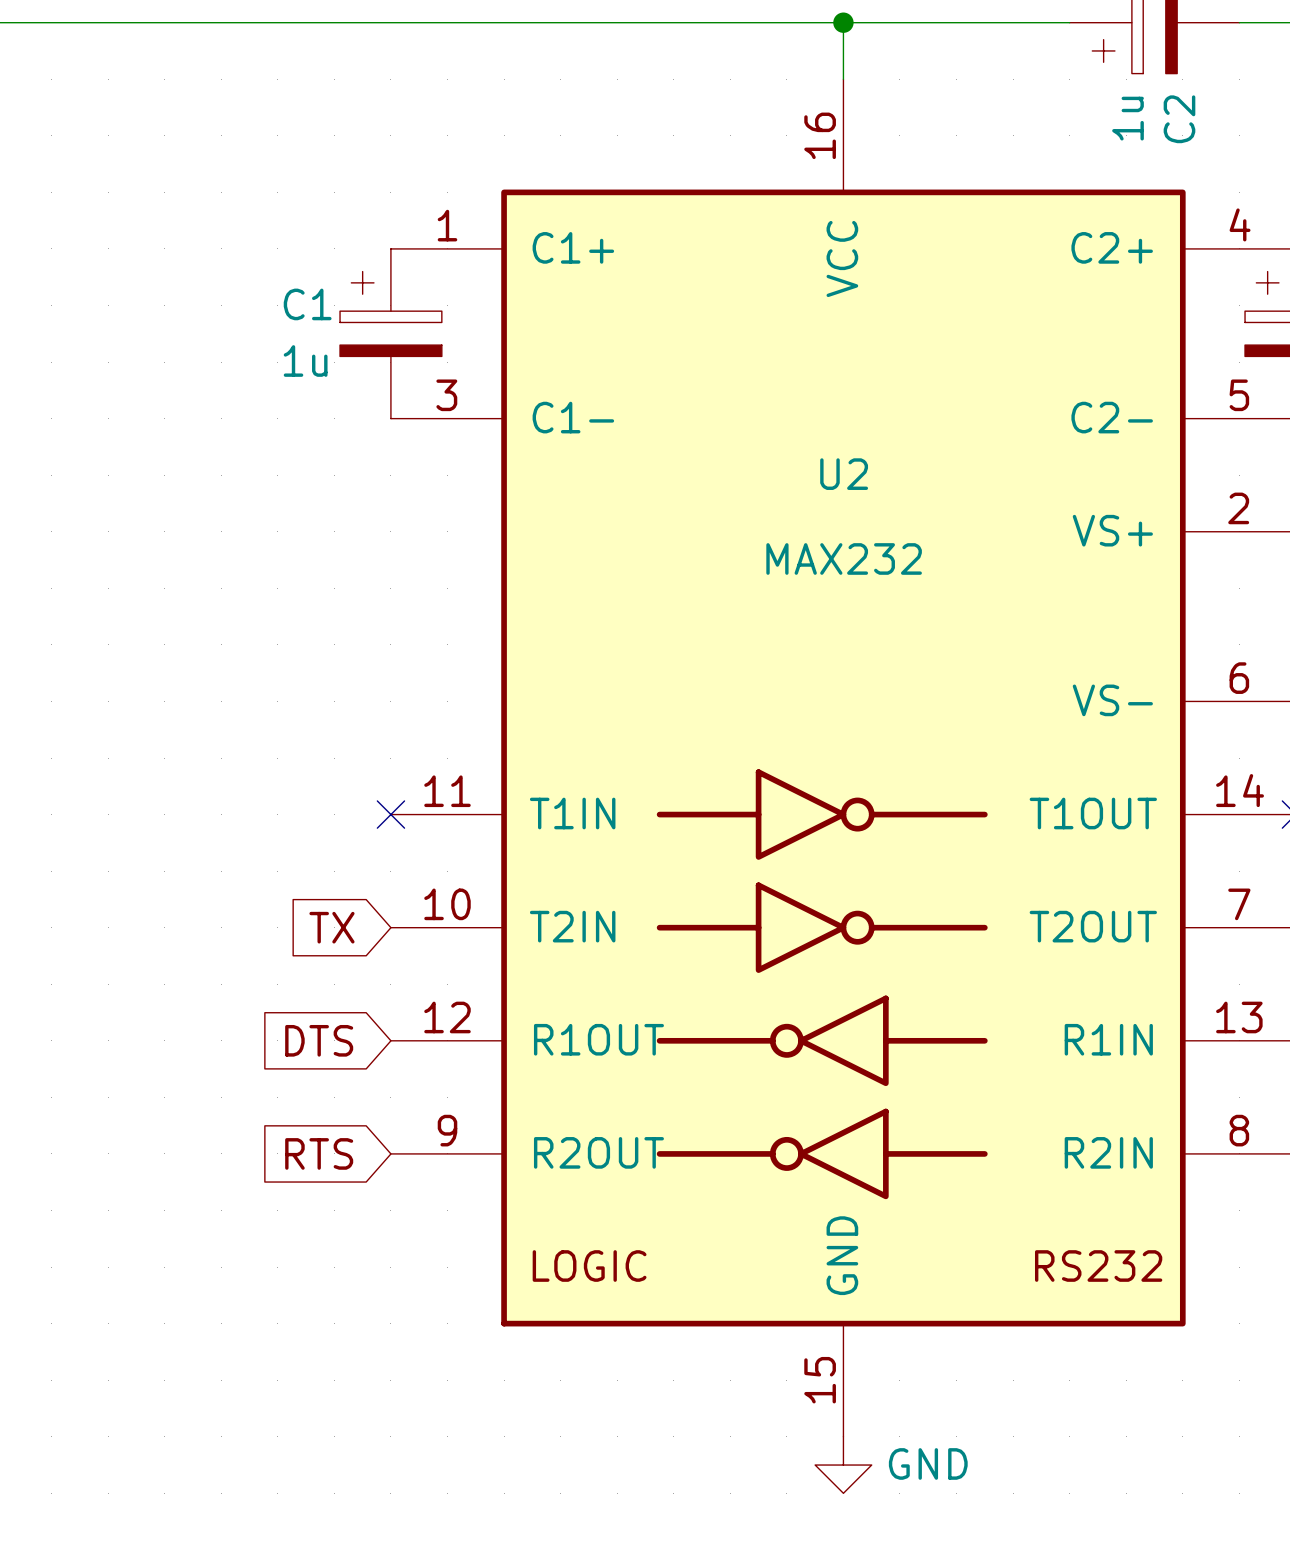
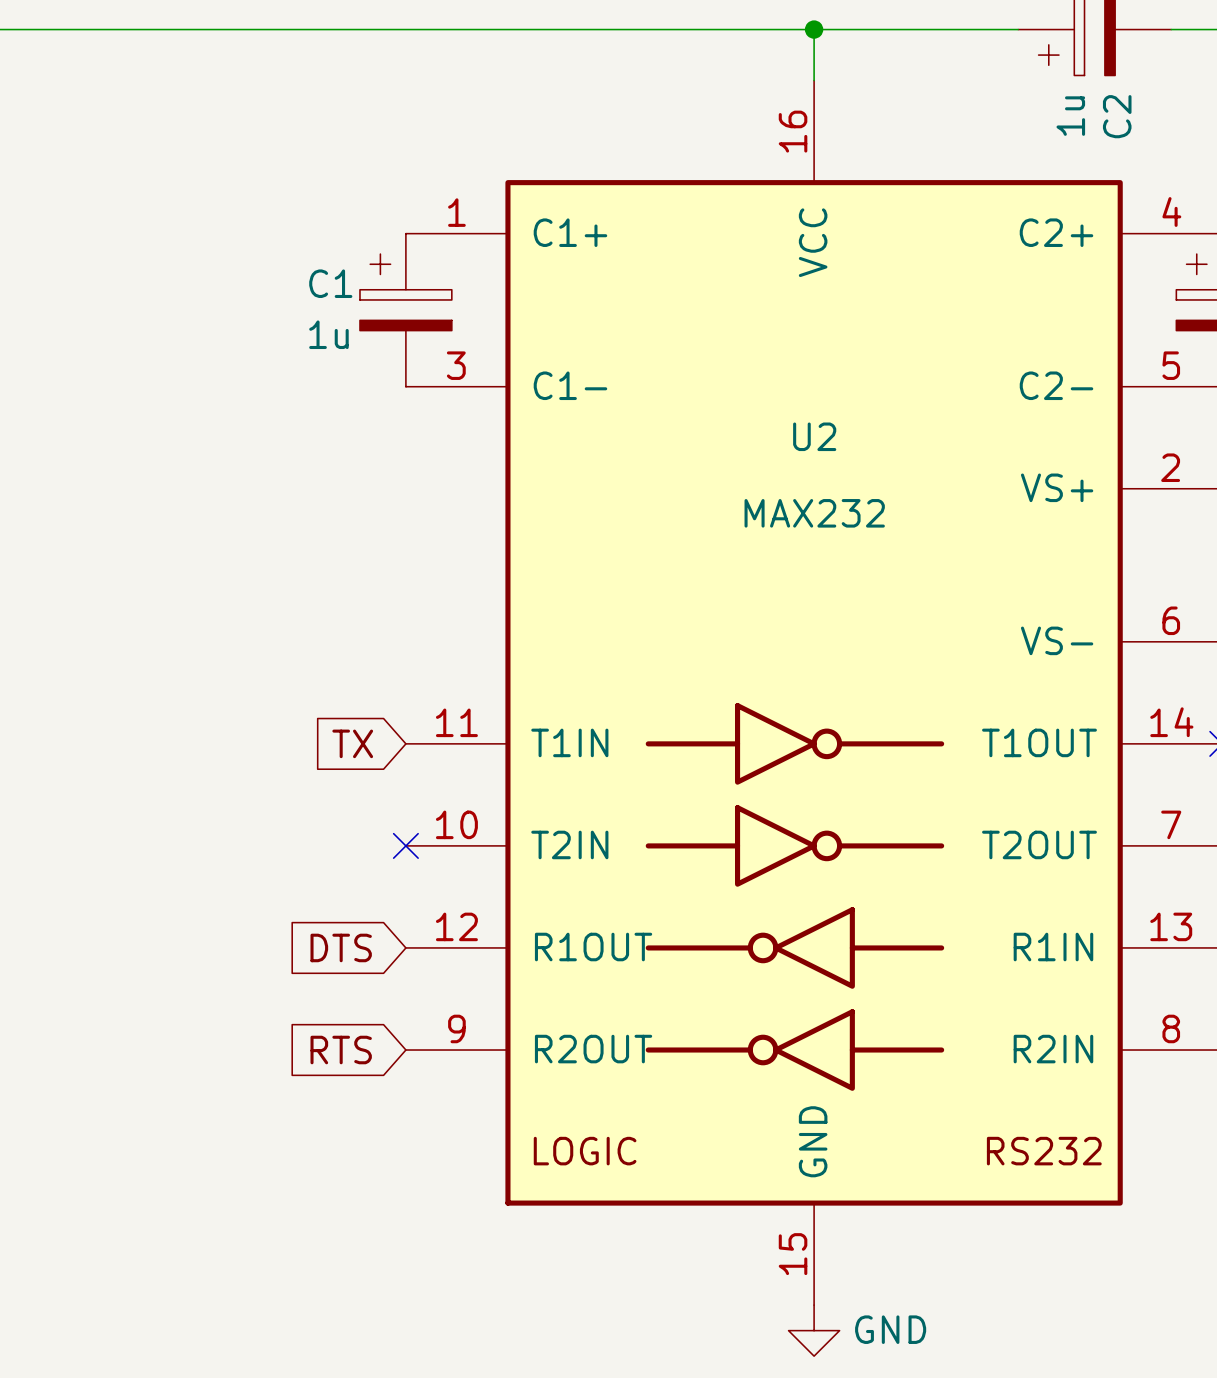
no-connect mark position: (390, 814) -> (405, 845)
global label position: TX (331, 927) -> TX (352, 743)

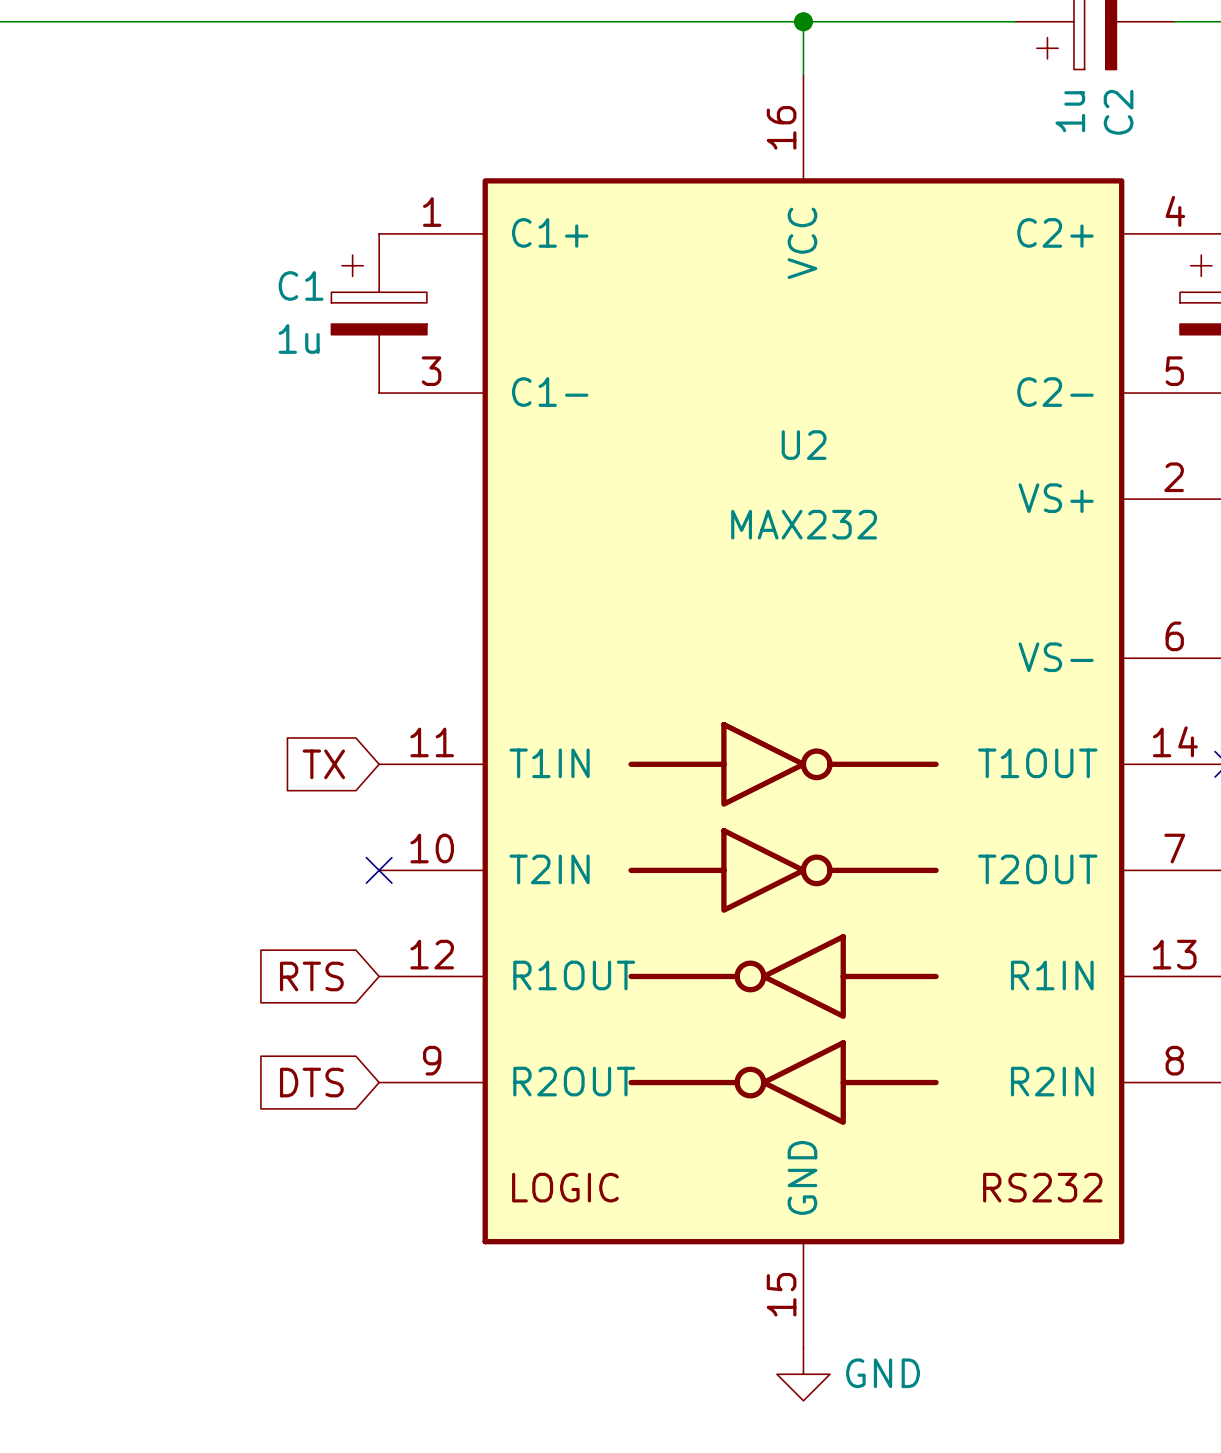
global label: DTS (341, 947) -> RTS (311, 976)
global label: RTS (341, 1050) -> DTS (311, 1082)

